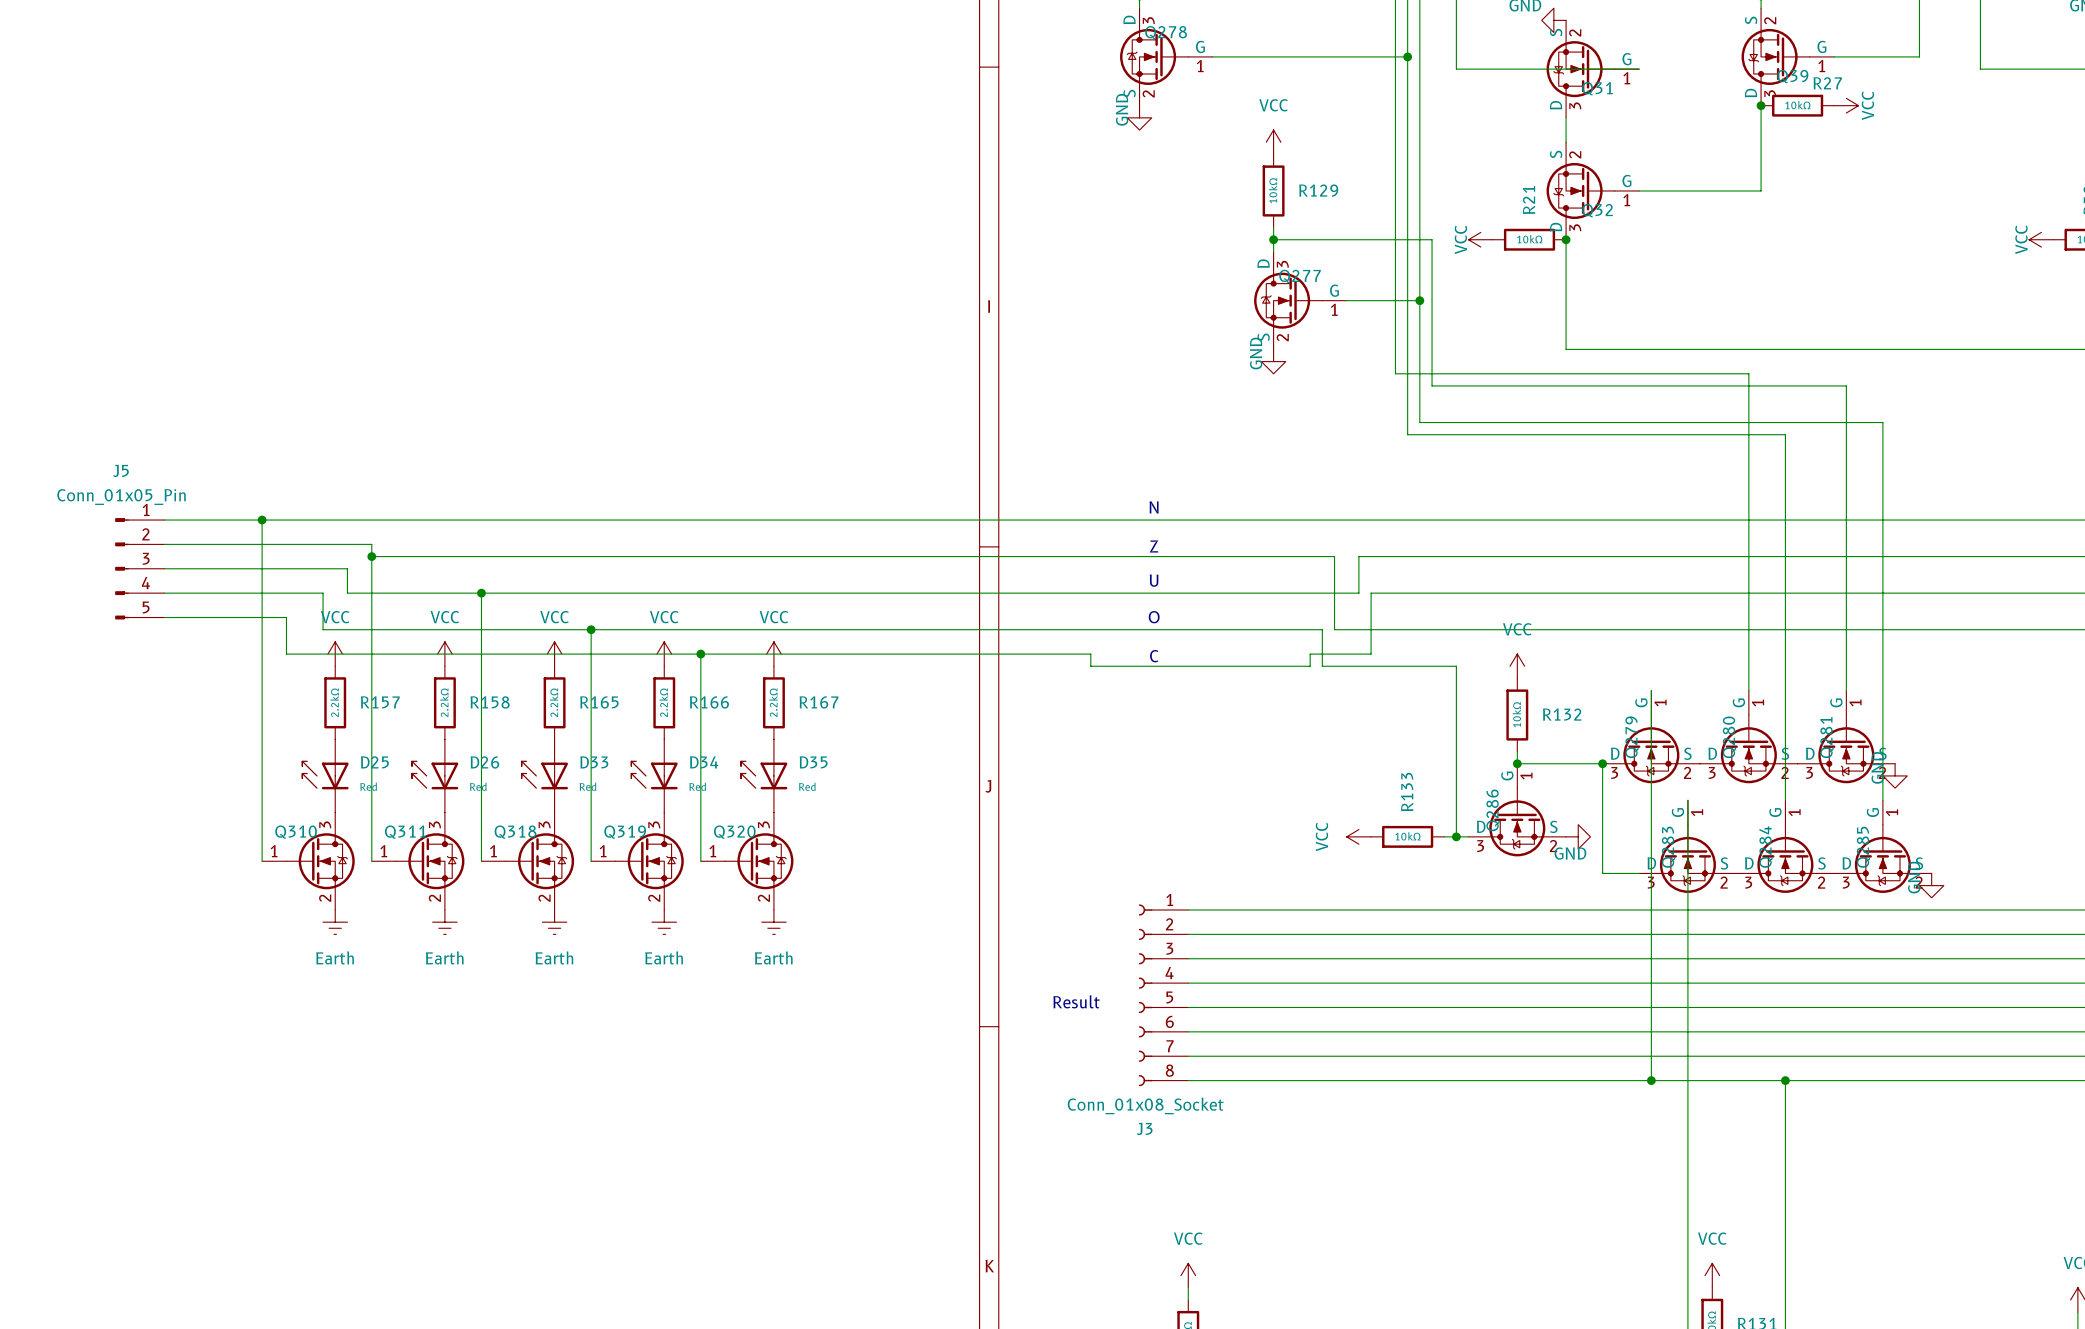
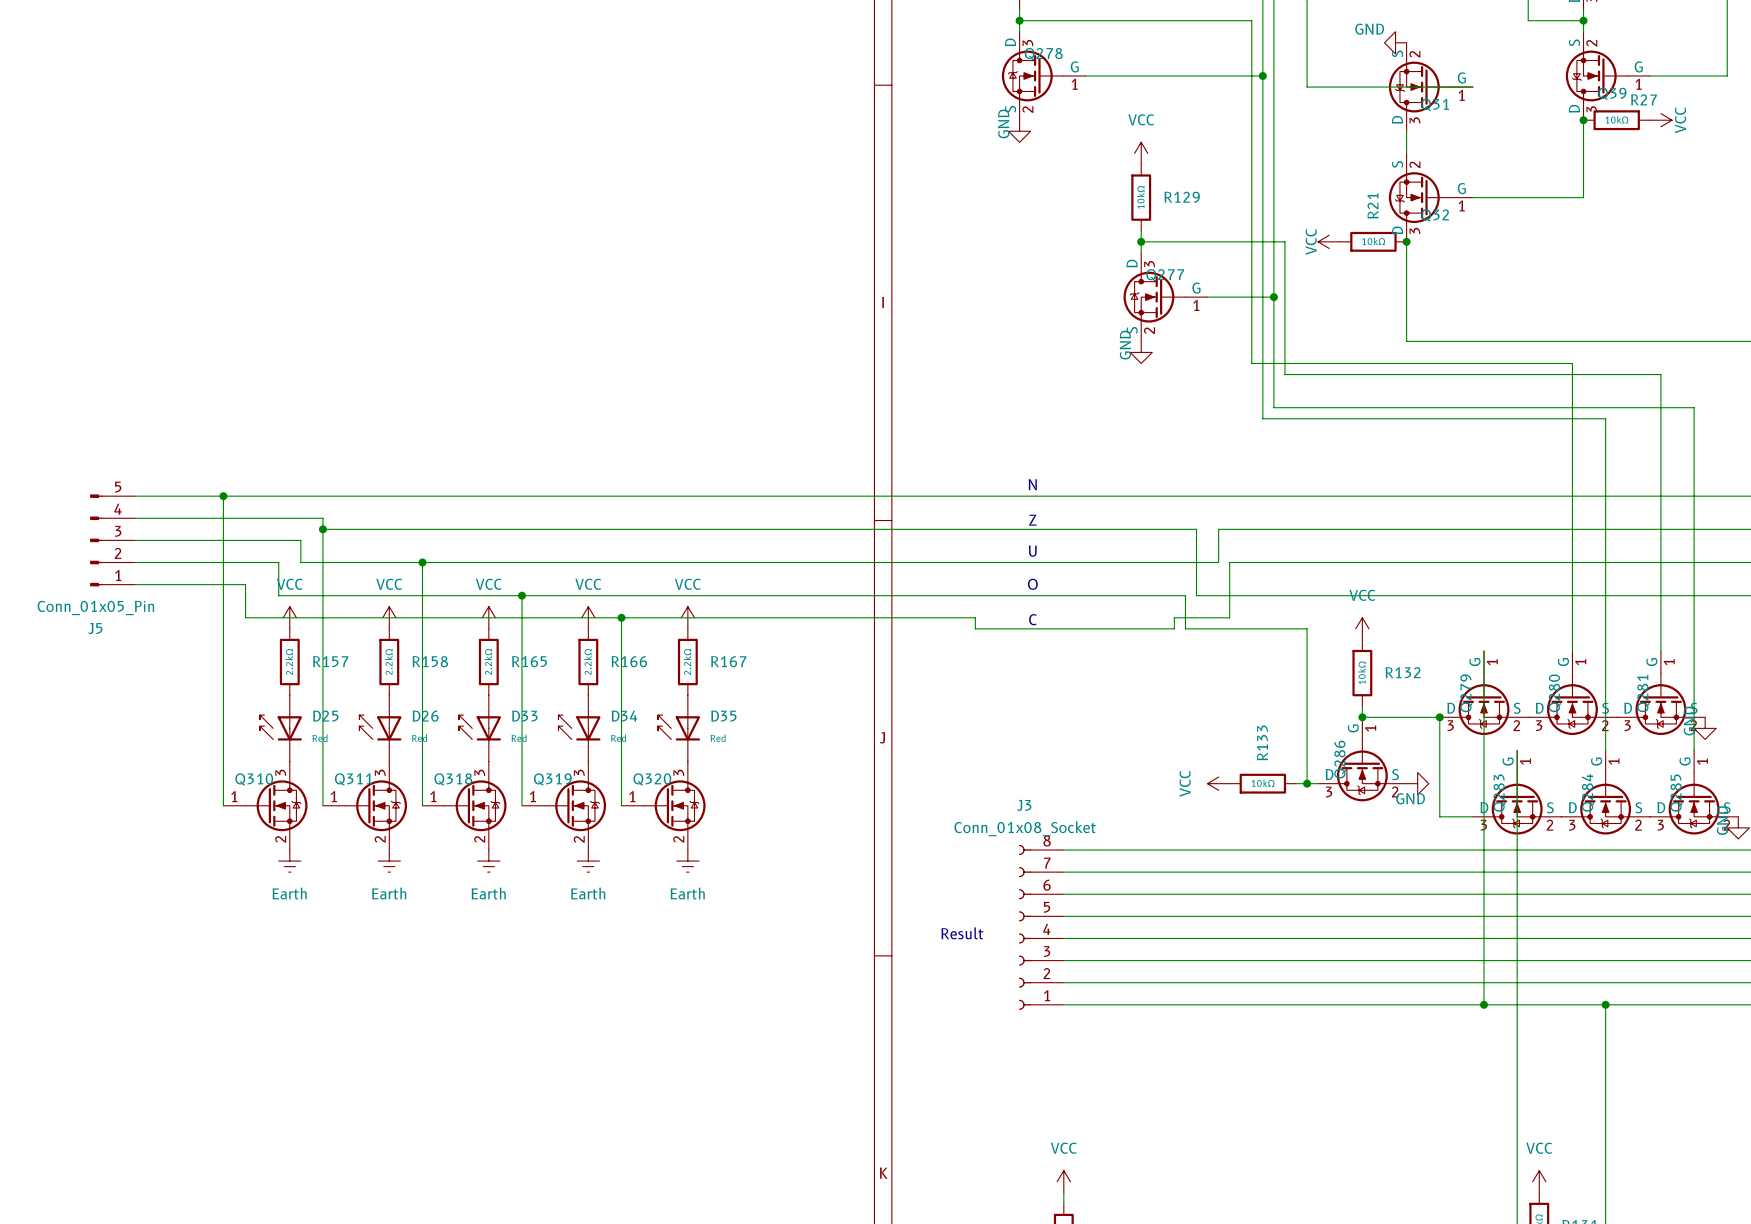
J5 flip: as is (121, 568) -> up-down (96, 540)
J3 flip: as is (1145, 995) -> up-down (1025, 927)

